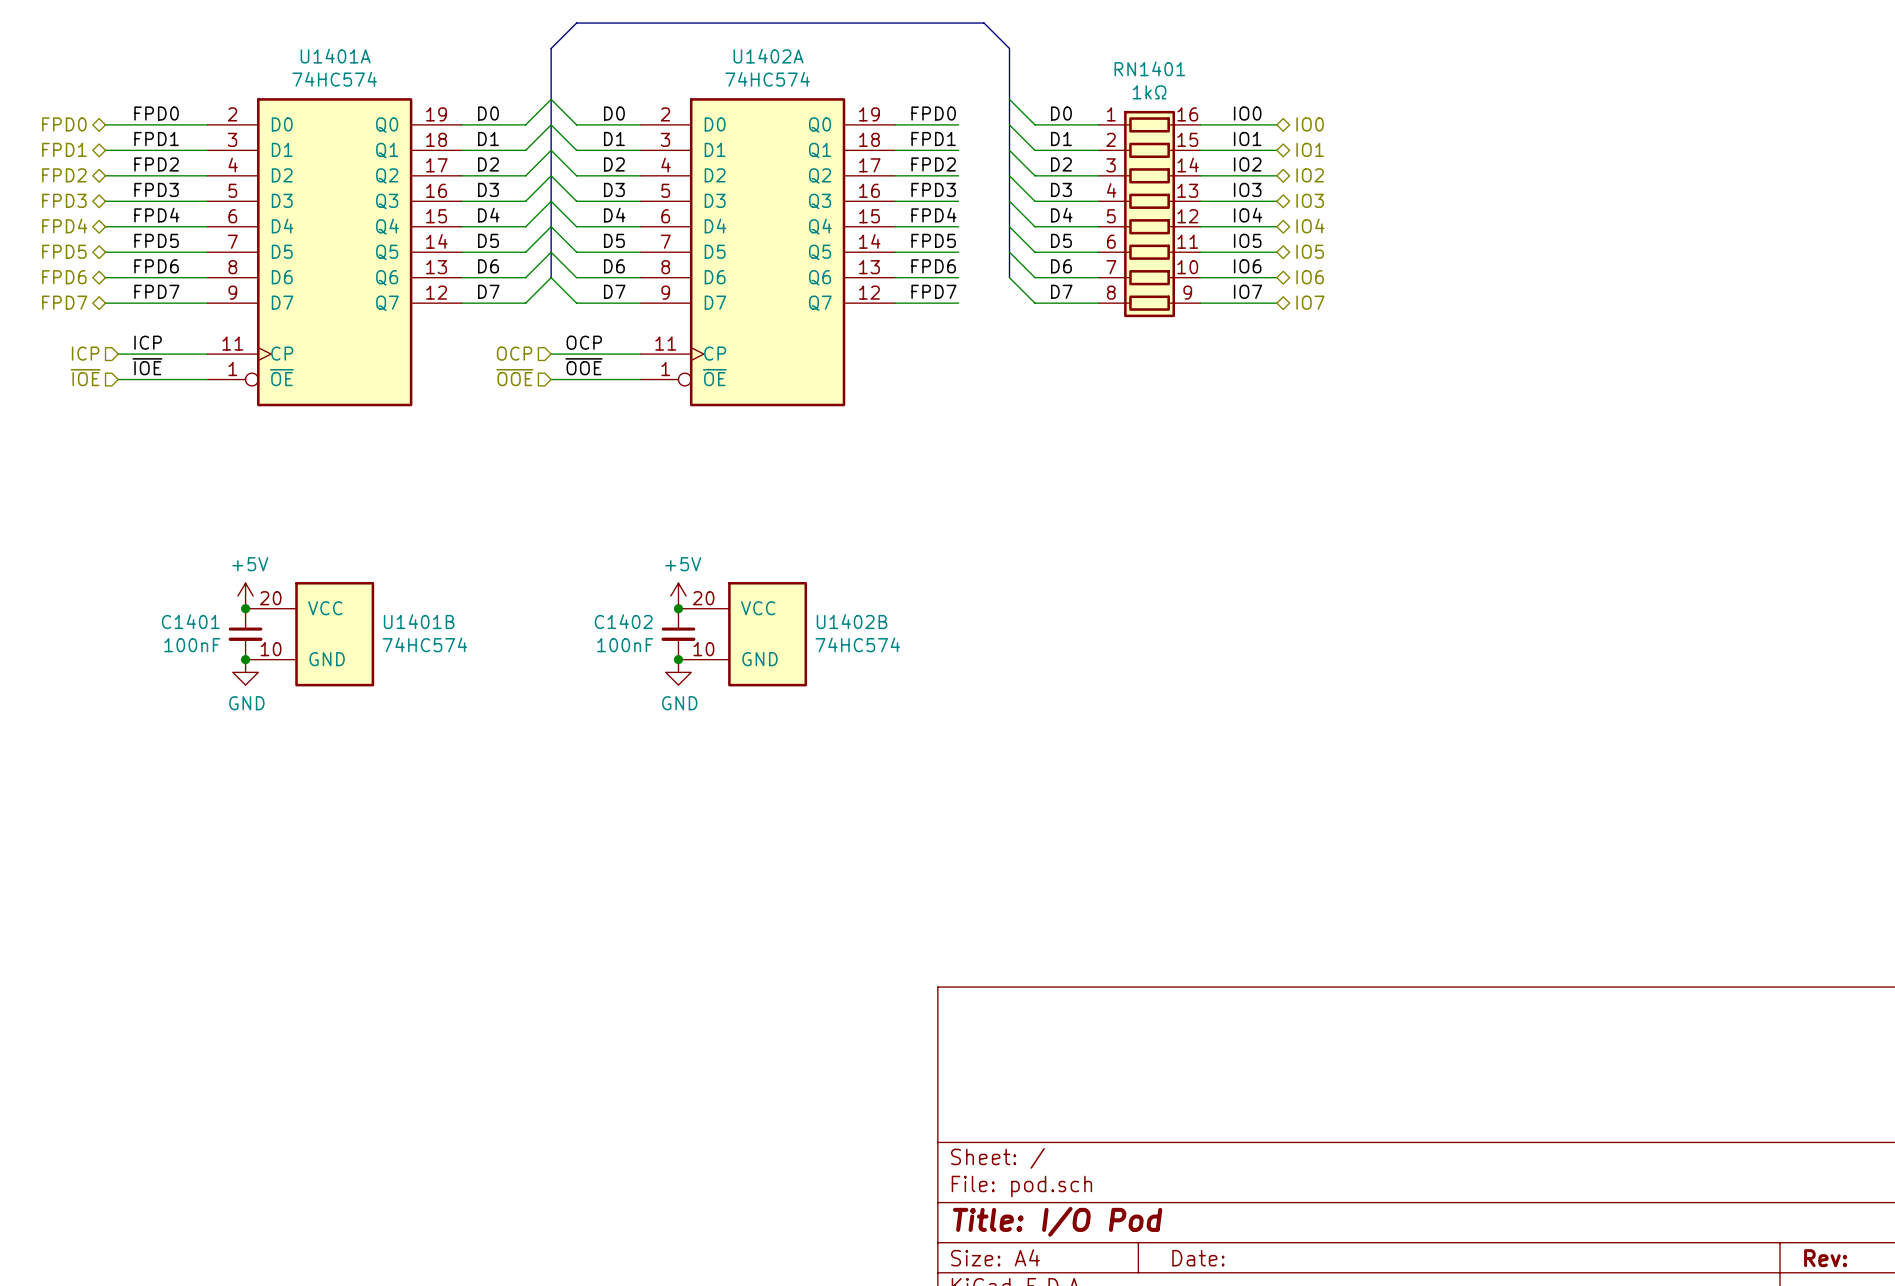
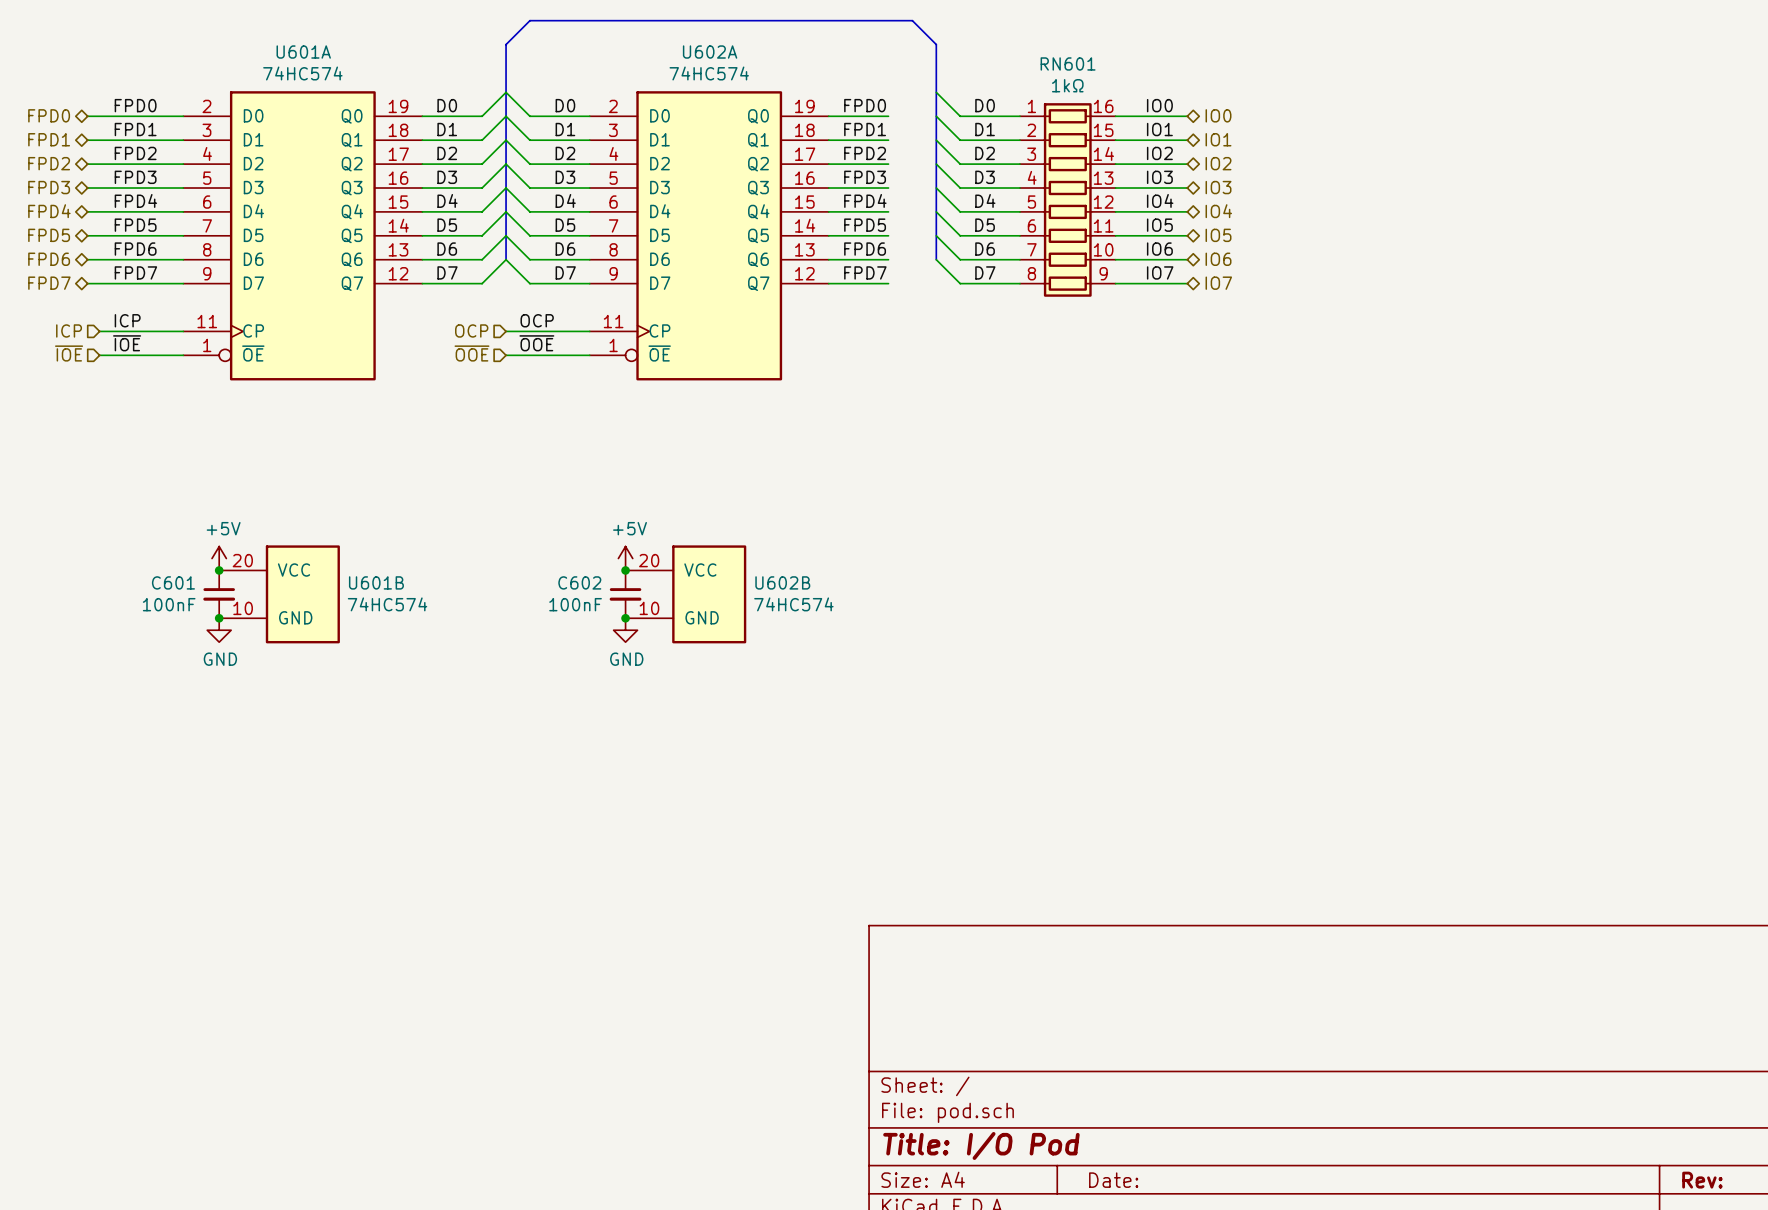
U1401A name: U1401A (335, 56) -> U601A (303, 52)
U1402A name: U1402A (768, 56) -> U602A (710, 52)
RN1401 name: RN1401 (1149, 68) -> RN601 (1068, 63)
C1401 name: C1401 (190, 621) -> C601 (173, 582)
U1401B name: U1401B (419, 621) -> U601B (376, 582)
C1402 name: C1402 (623, 621) -> C602 (579, 582)
U1402B name: U1402B (852, 621) -> U602B (782, 582)

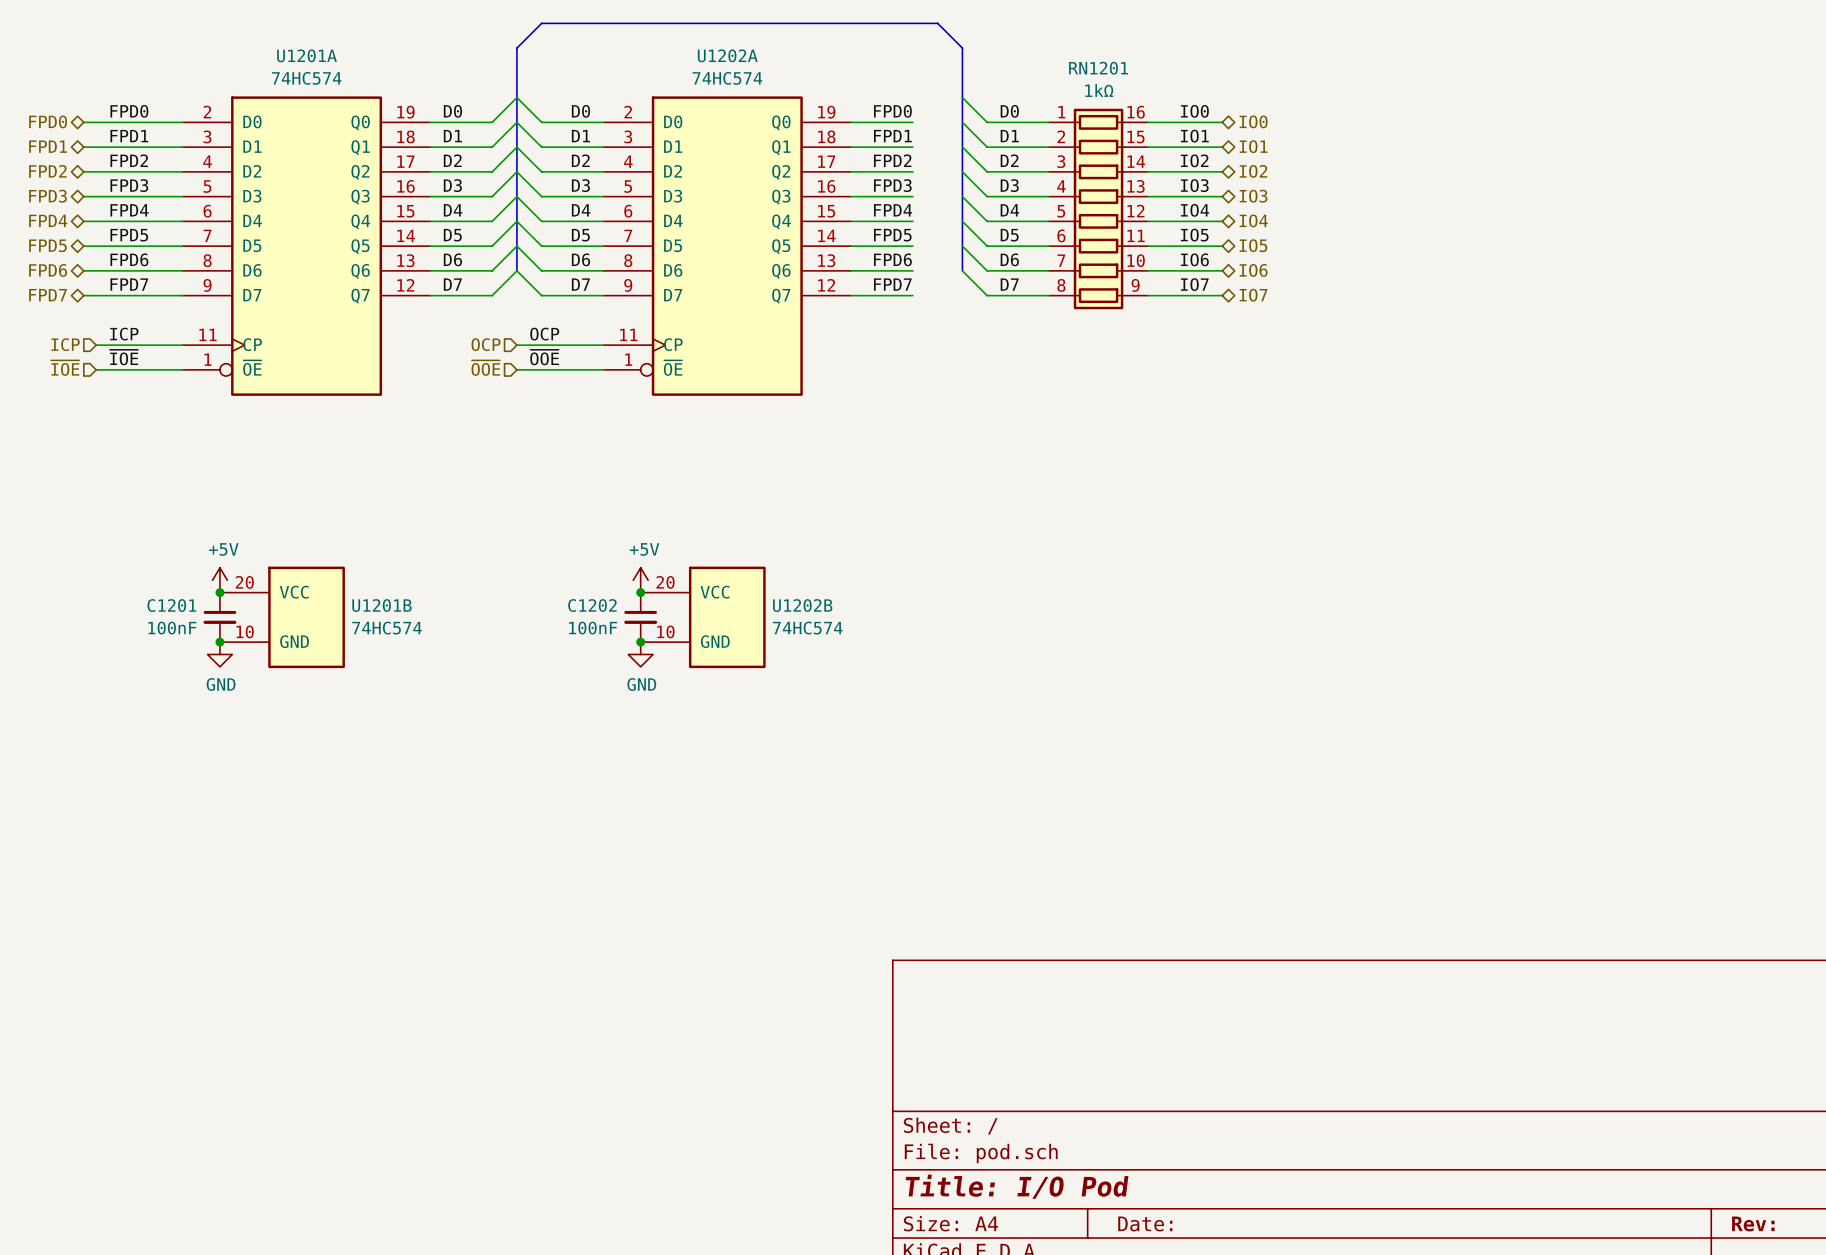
U601A name: U601A (303, 52) -> U1201A (307, 55)
U602A name: U602A (710, 52) -> U1202A (727, 55)
RN601 name: RN601 (1068, 63) -> RN1201 (1098, 68)
C601 name: C601 (173, 582) -> C1201 (171, 605)
U601B name: U601B (376, 582) -> U1201B (381, 605)
C602 name: C602 (579, 582) -> C1202 (592, 605)
U602B name: U602B (782, 582) -> U1202B (802, 605)

